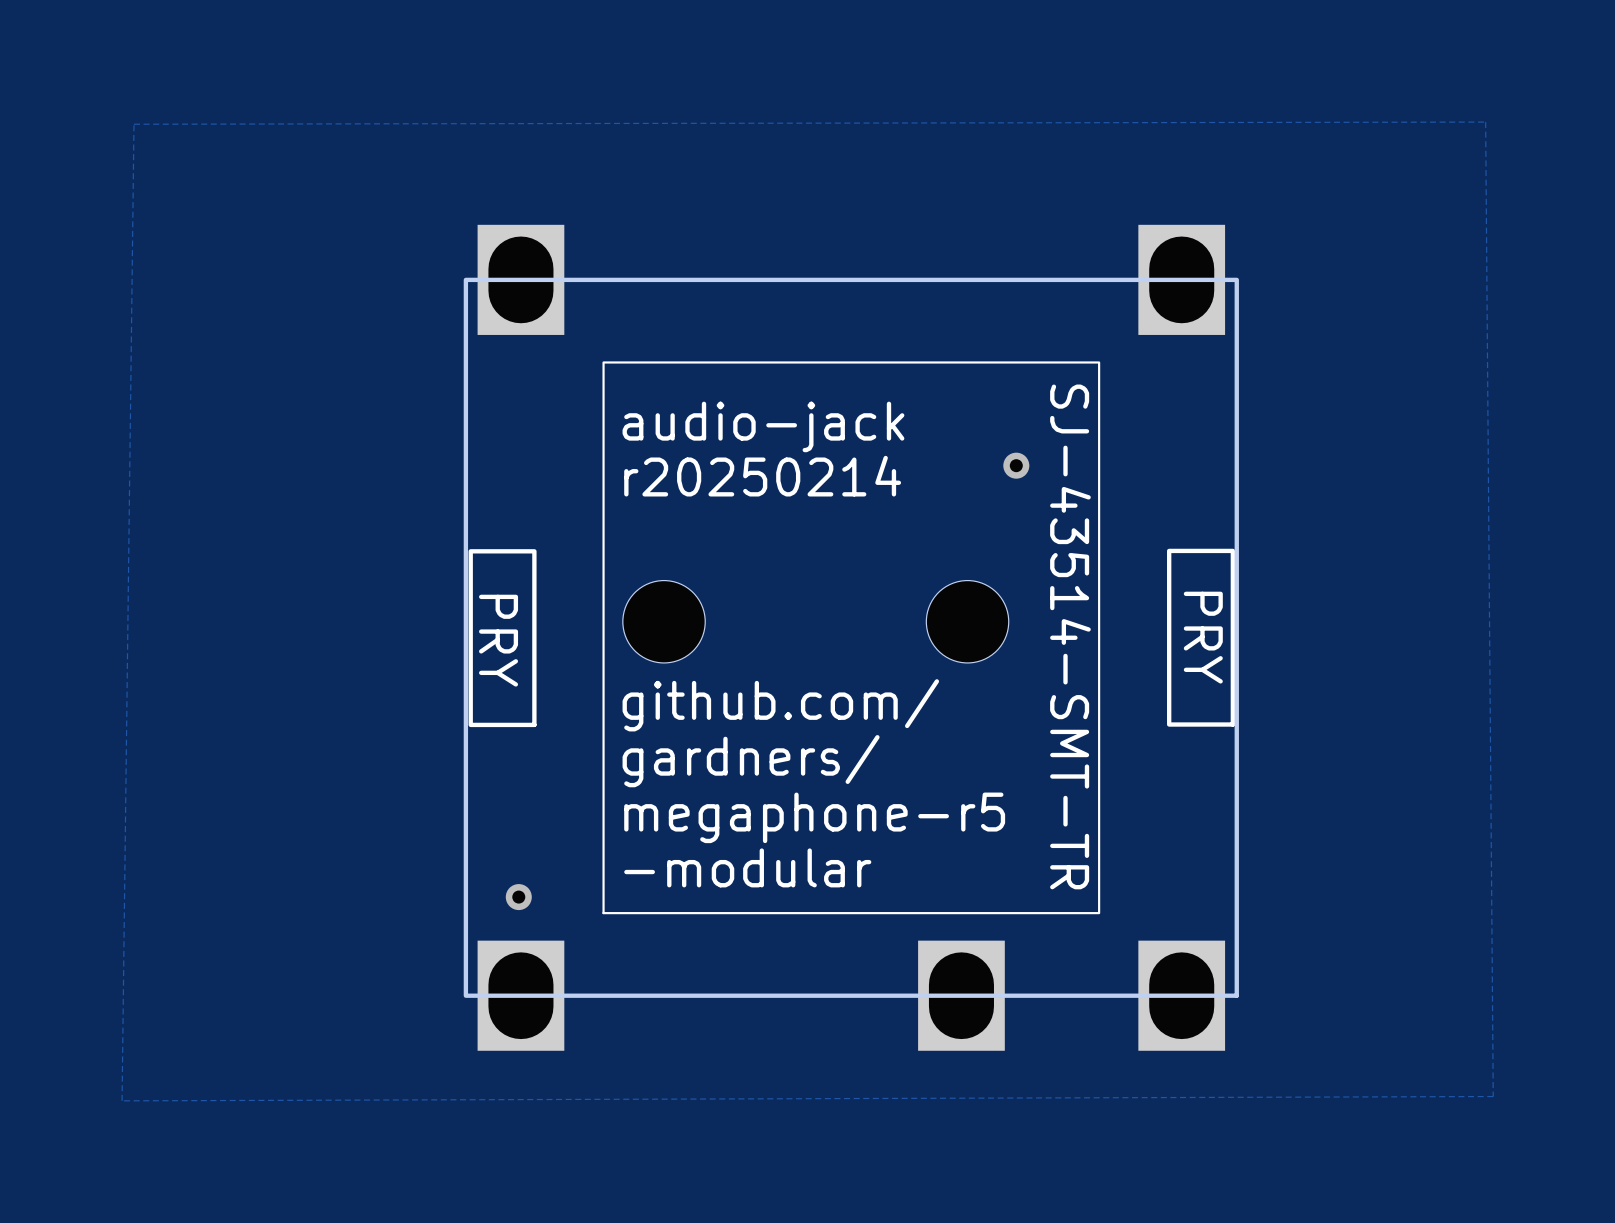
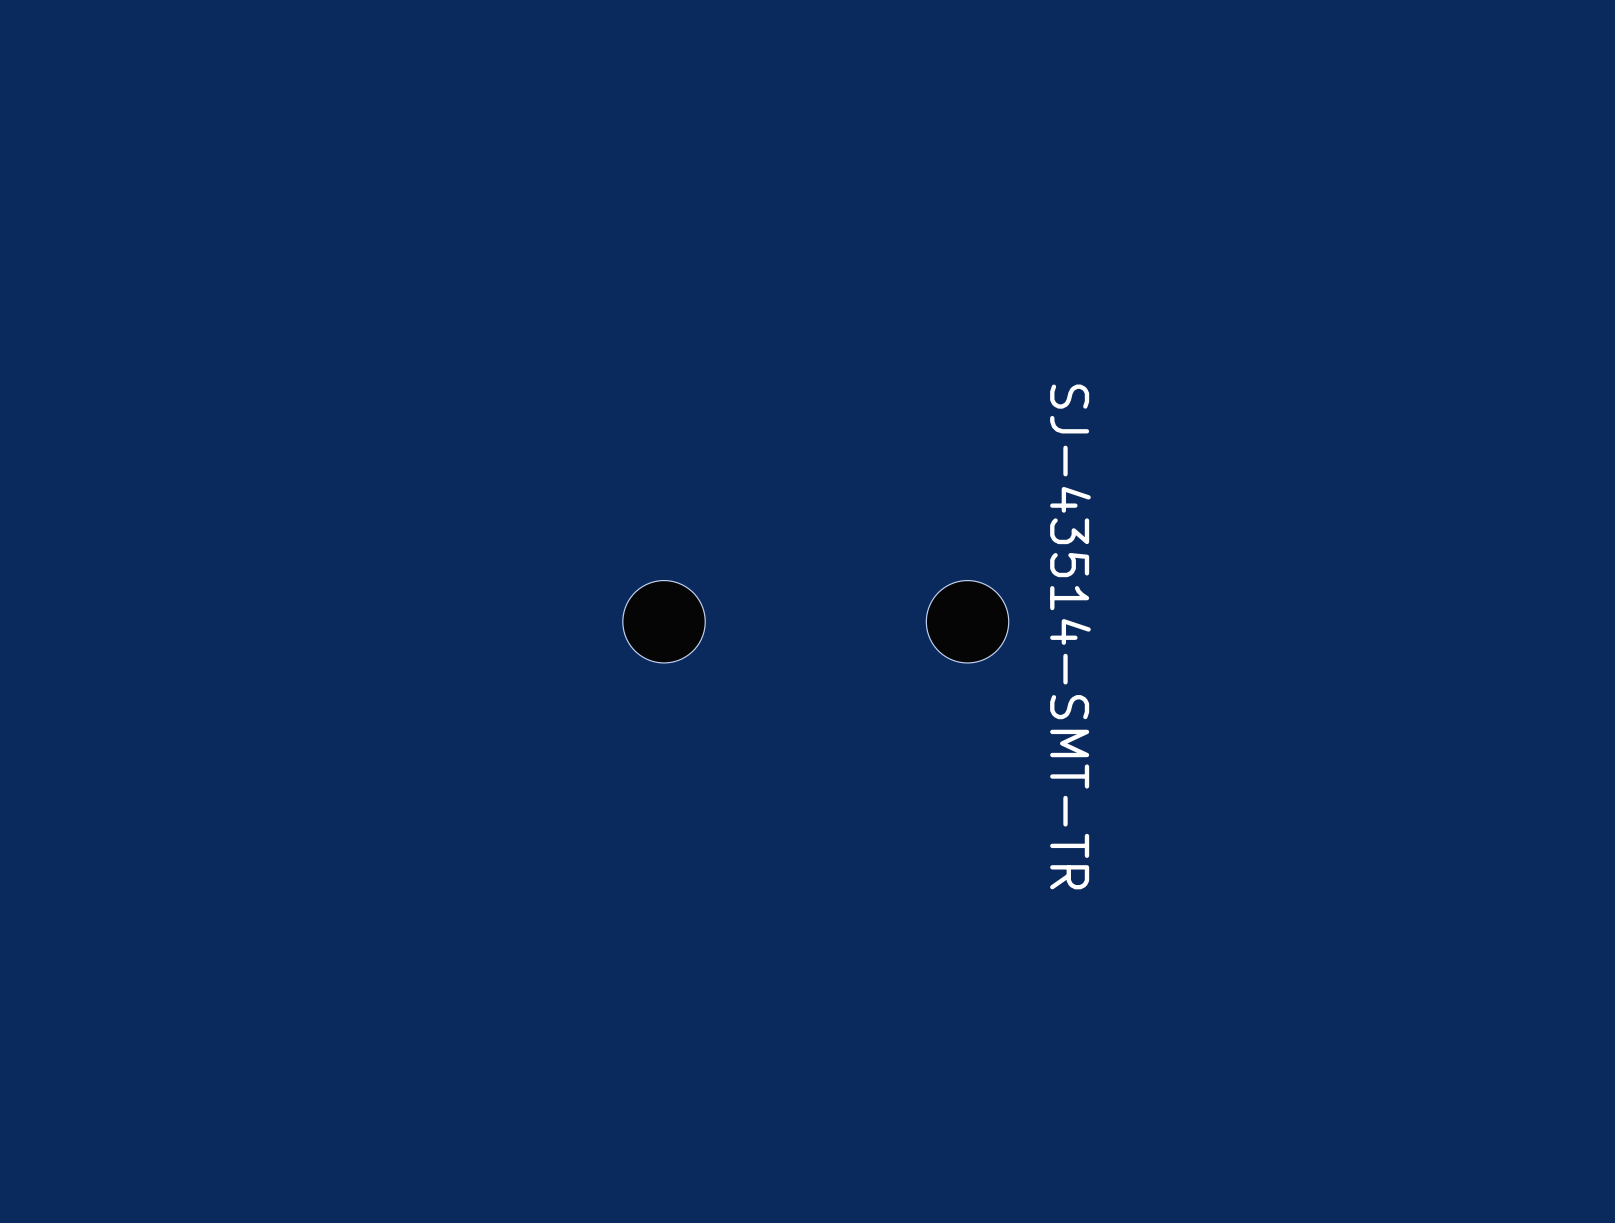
zone outline: (1485, 122) (1493, 1096) (122, 1100) (133, 124) (1485, 122) -> none
text: audio-jack (763, 426) -> none
via: (1016, 465) -> none
text: r20250214 (762, 476) -> none
part: (851, 637) -> none
text: github.com/ (780, 705) -> none
text: gardners/ (751, 761) -> none
text: megaphone-r5 (814, 817) -> none
text: -modular (747, 867) -> none
via: (518, 897) -> none

